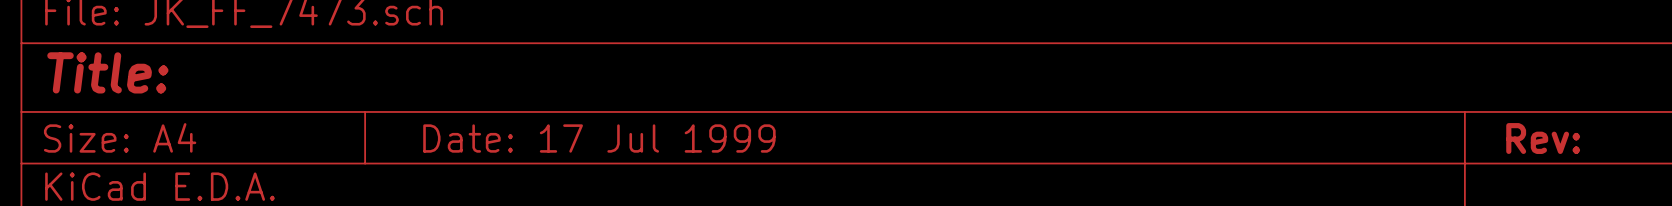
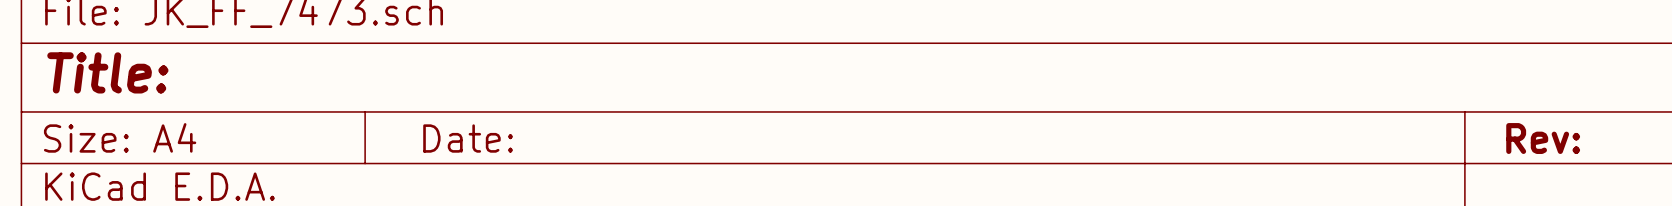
title block: Date: 17 Jul 1999 (599, 138) -> Date: (468, 138)

